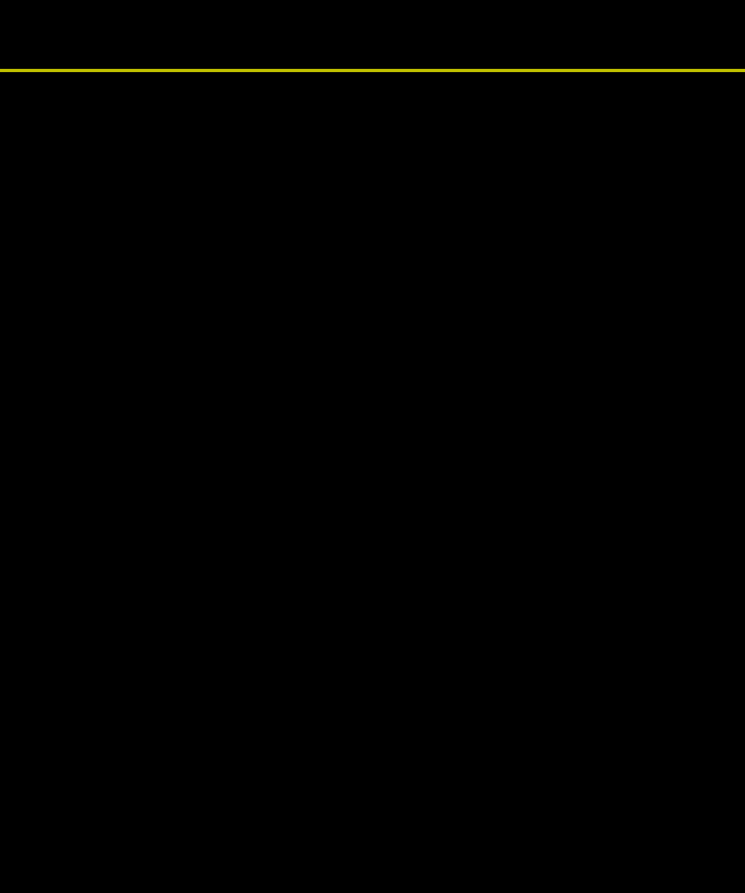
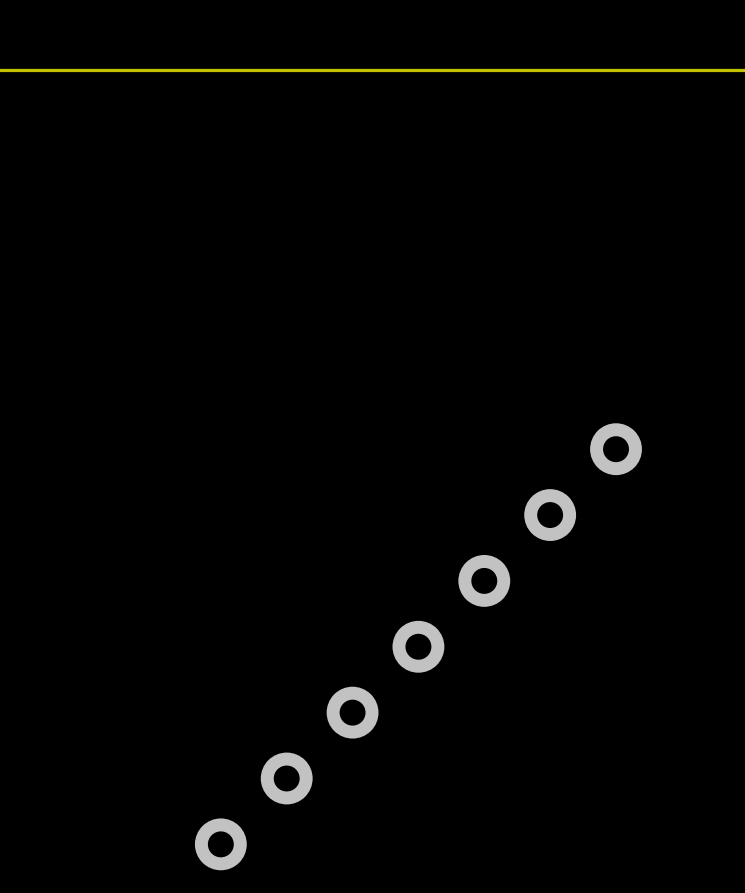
via: none -> (616, 449)
via: none -> (550, 515)
via: none -> (484, 580)
via: none -> (418, 646)
via: none -> (352, 712)
via: none -> (286, 778)
via: none -> (220, 844)

